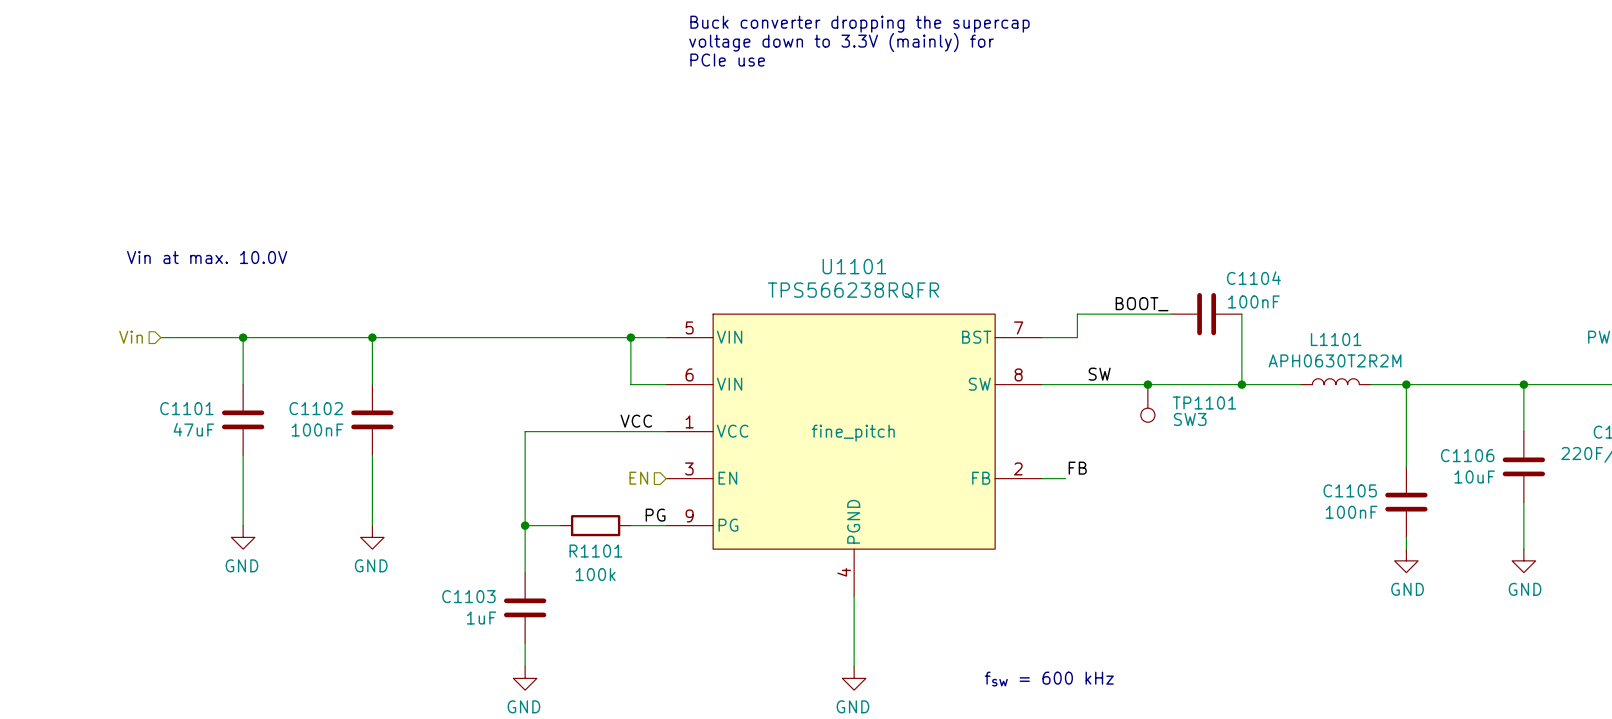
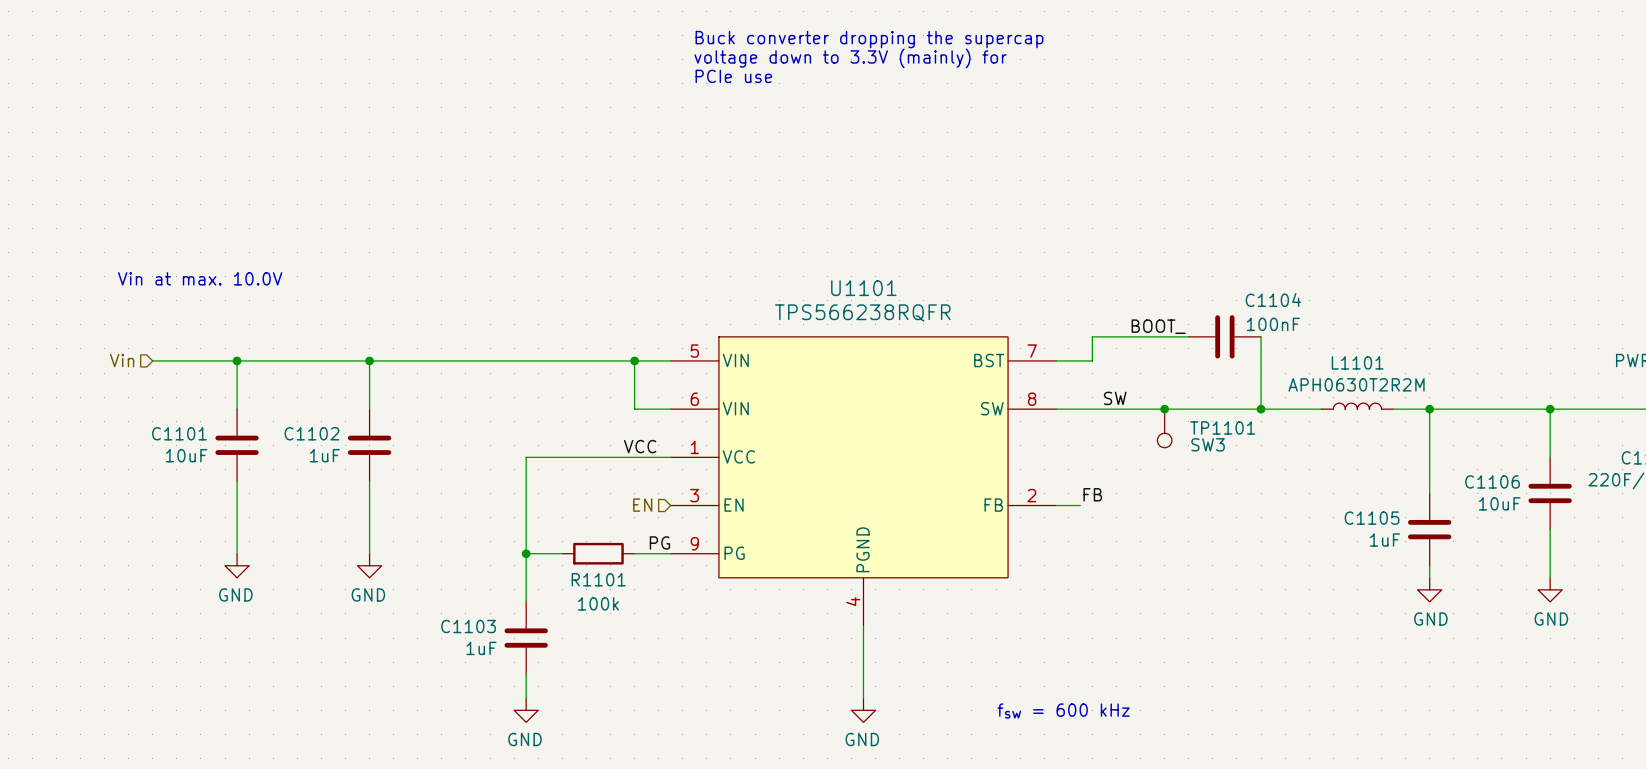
C1101 value: 47uF (193, 429) -> 10uF (186, 455)
C1102 value: 100nF (317, 430) -> 1uF (324, 455)
U1101 text: fine_pitch (853, 433) -> none
C1105 value: 100nF (1351, 512) -> 1uF (1384, 540)

